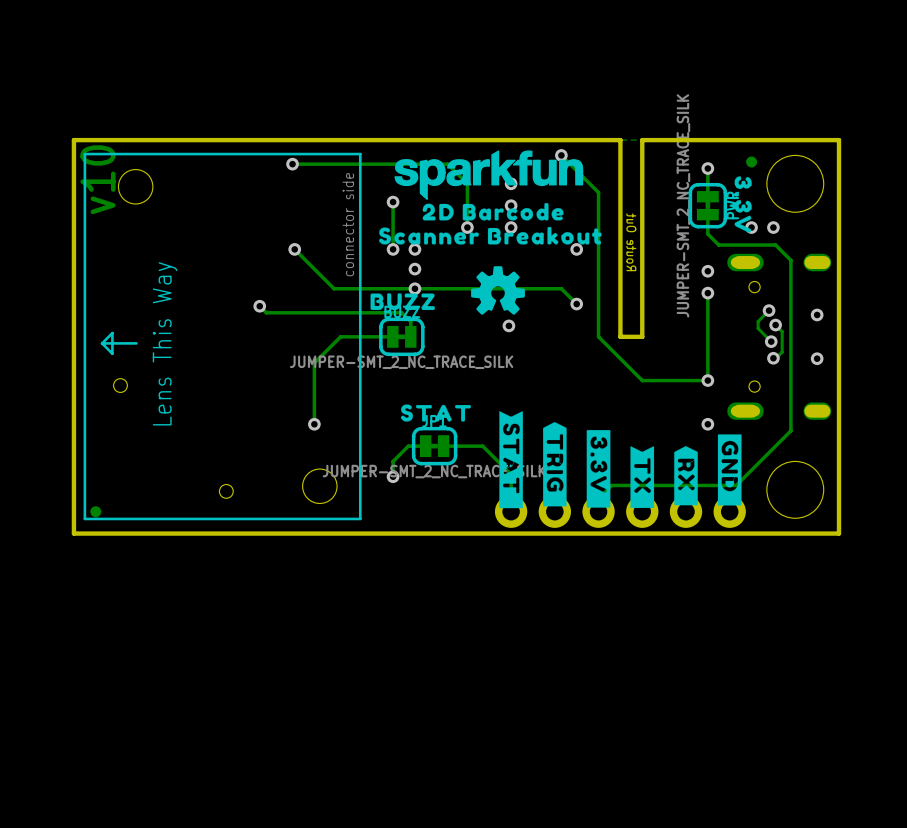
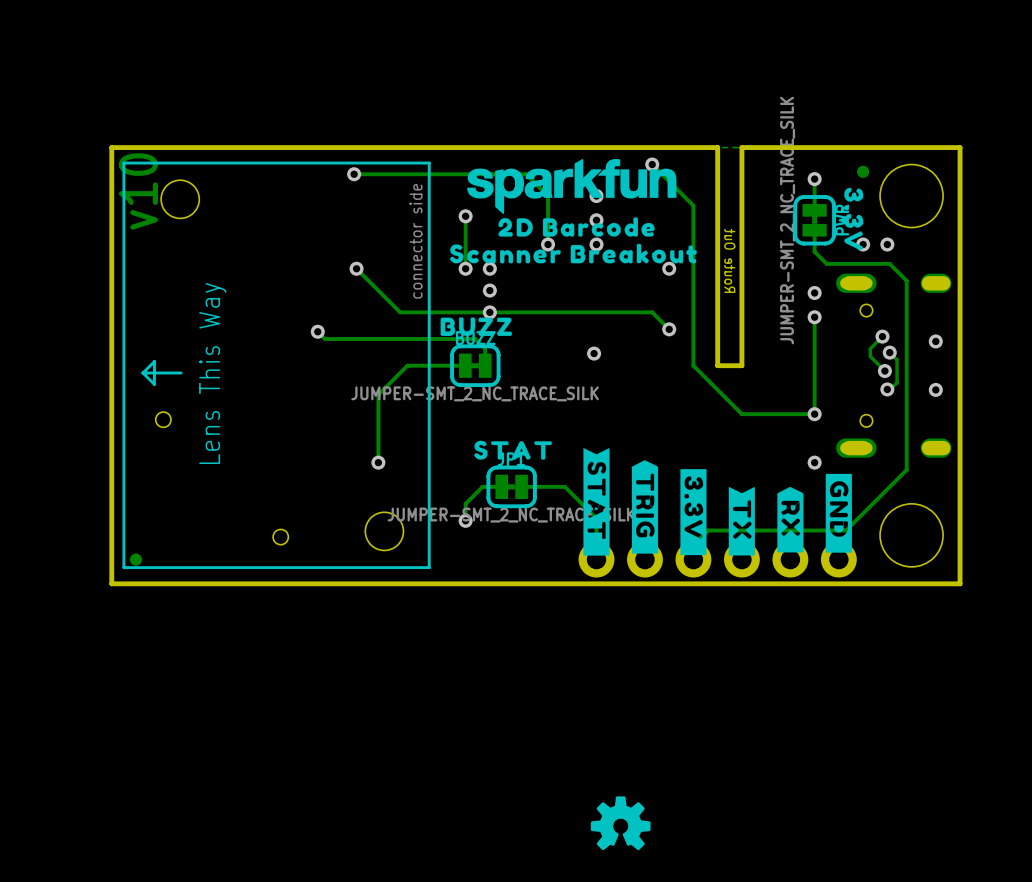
drawing: [471, 266, 525, 315] -> none
drawing: none -> [590, 796, 651, 851]

